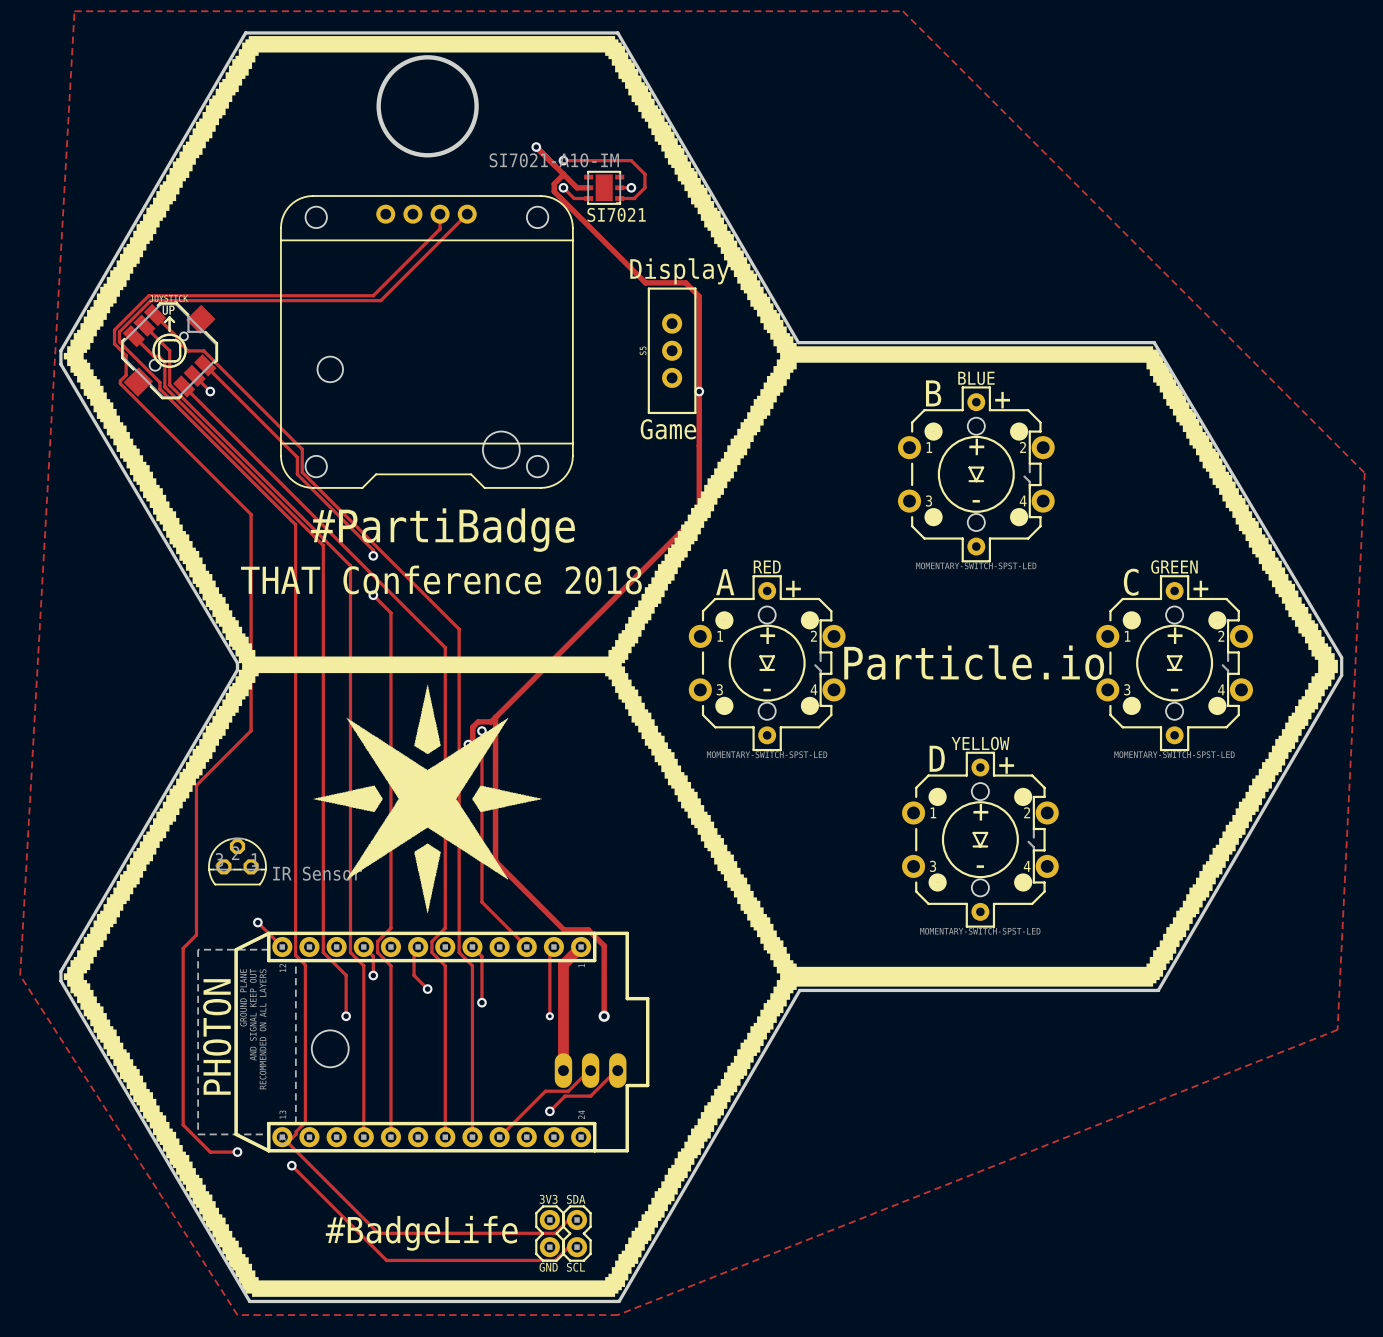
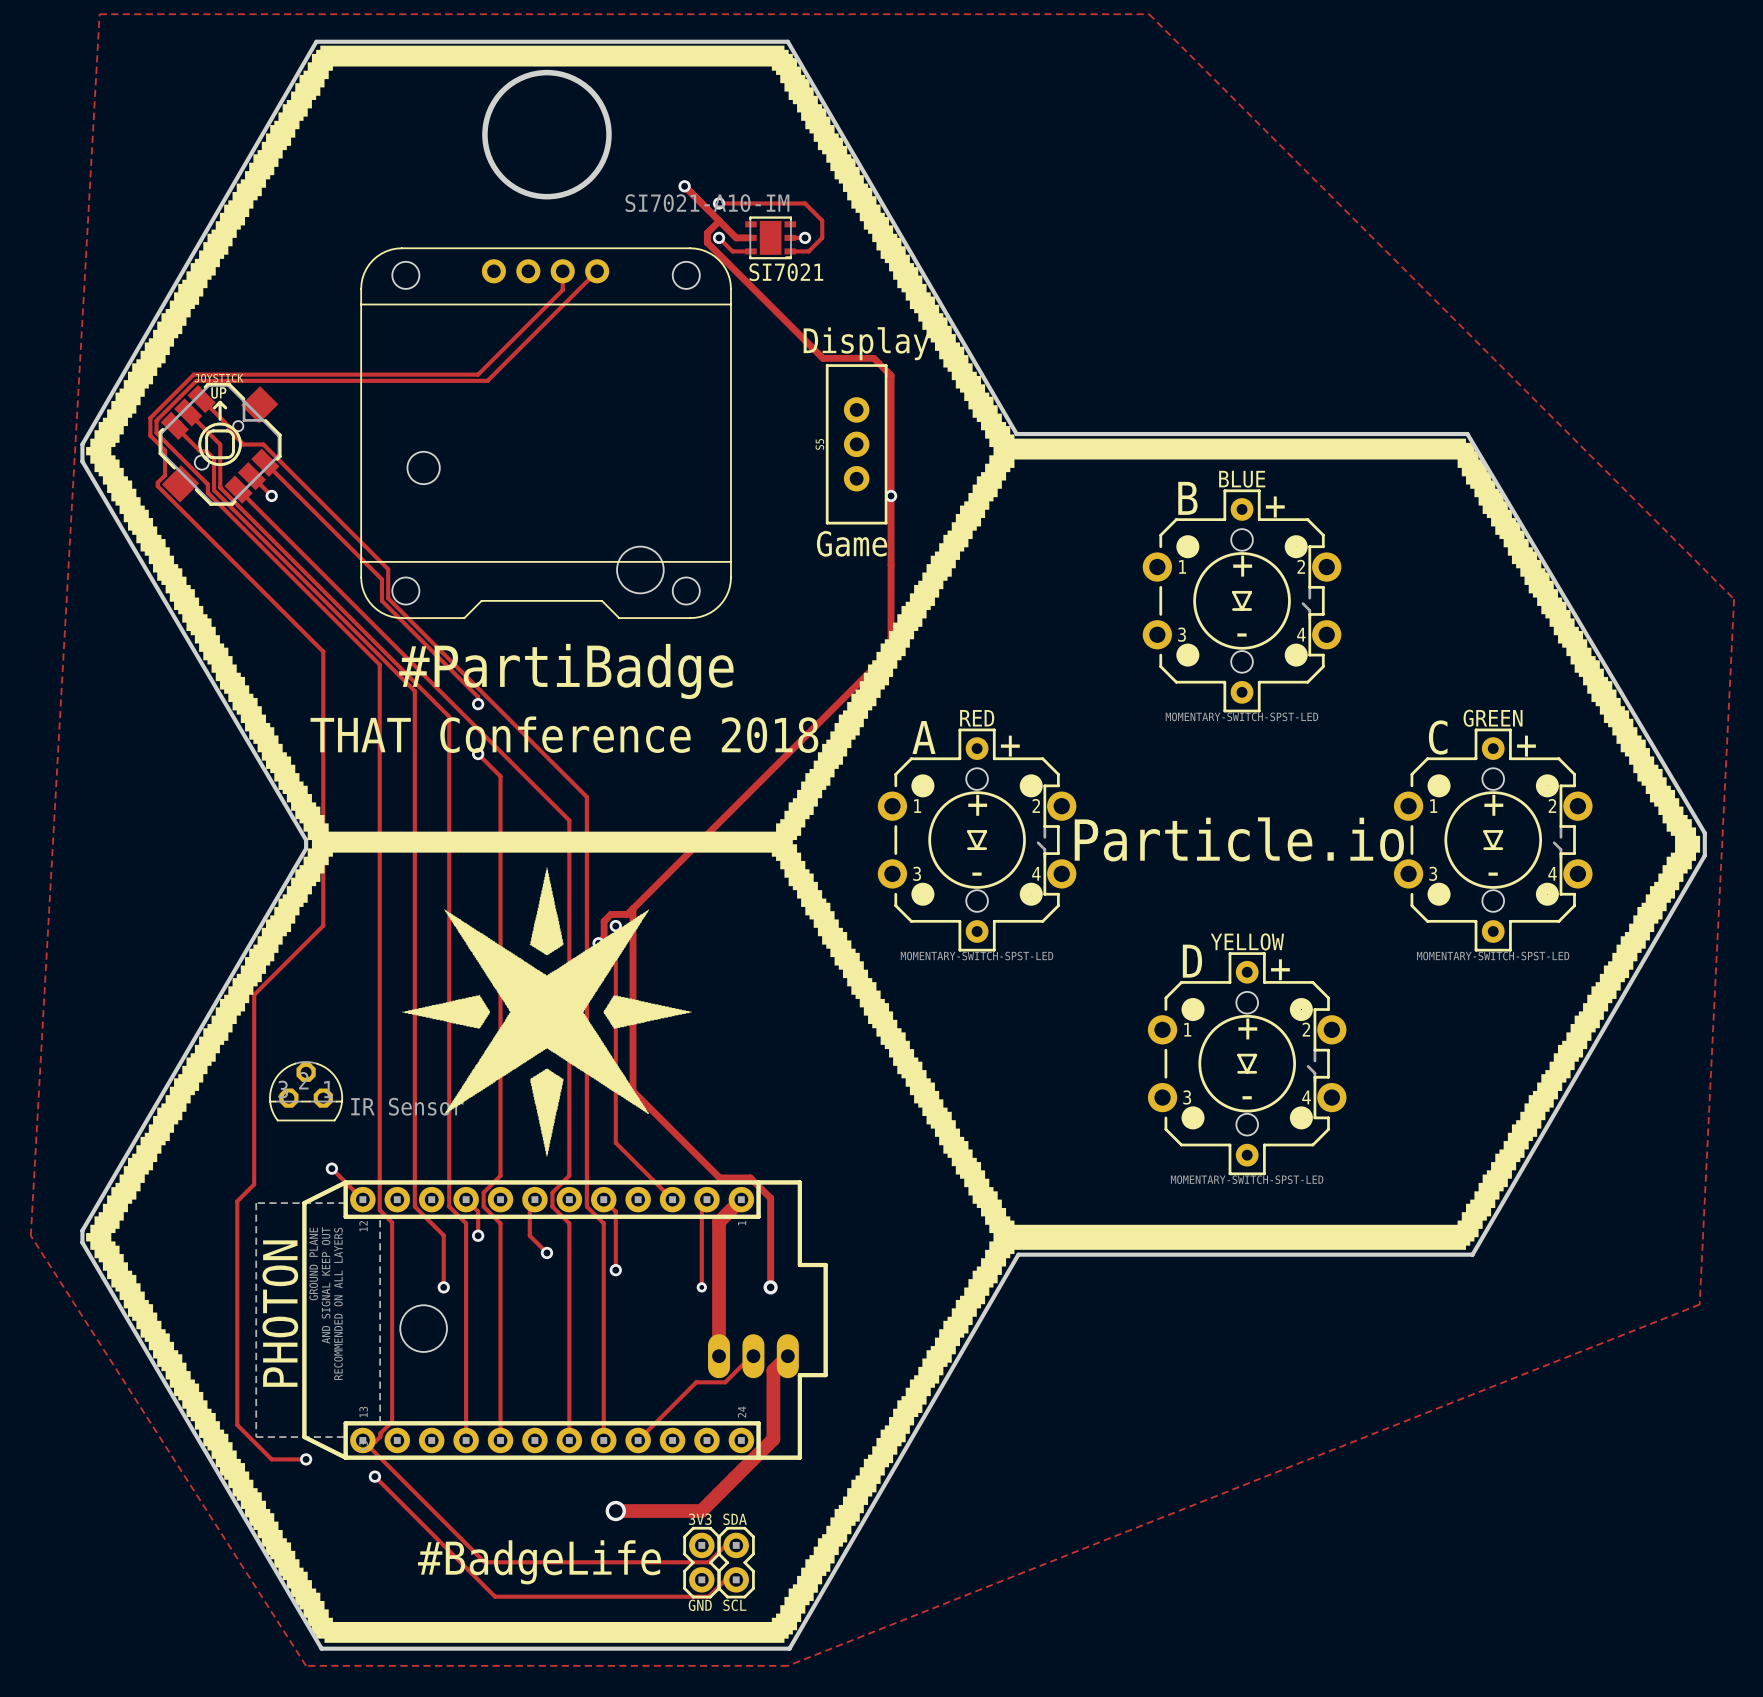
track: (616, 1070) (590, 1096) (565, 1096) (549, 1111) -> none
track: none -> (787, 1356) (773, 1370) (773, 1439) (701, 1511) (615, 1511)
via: (549, 1111) -> none
via: none -> (615, 1511)

